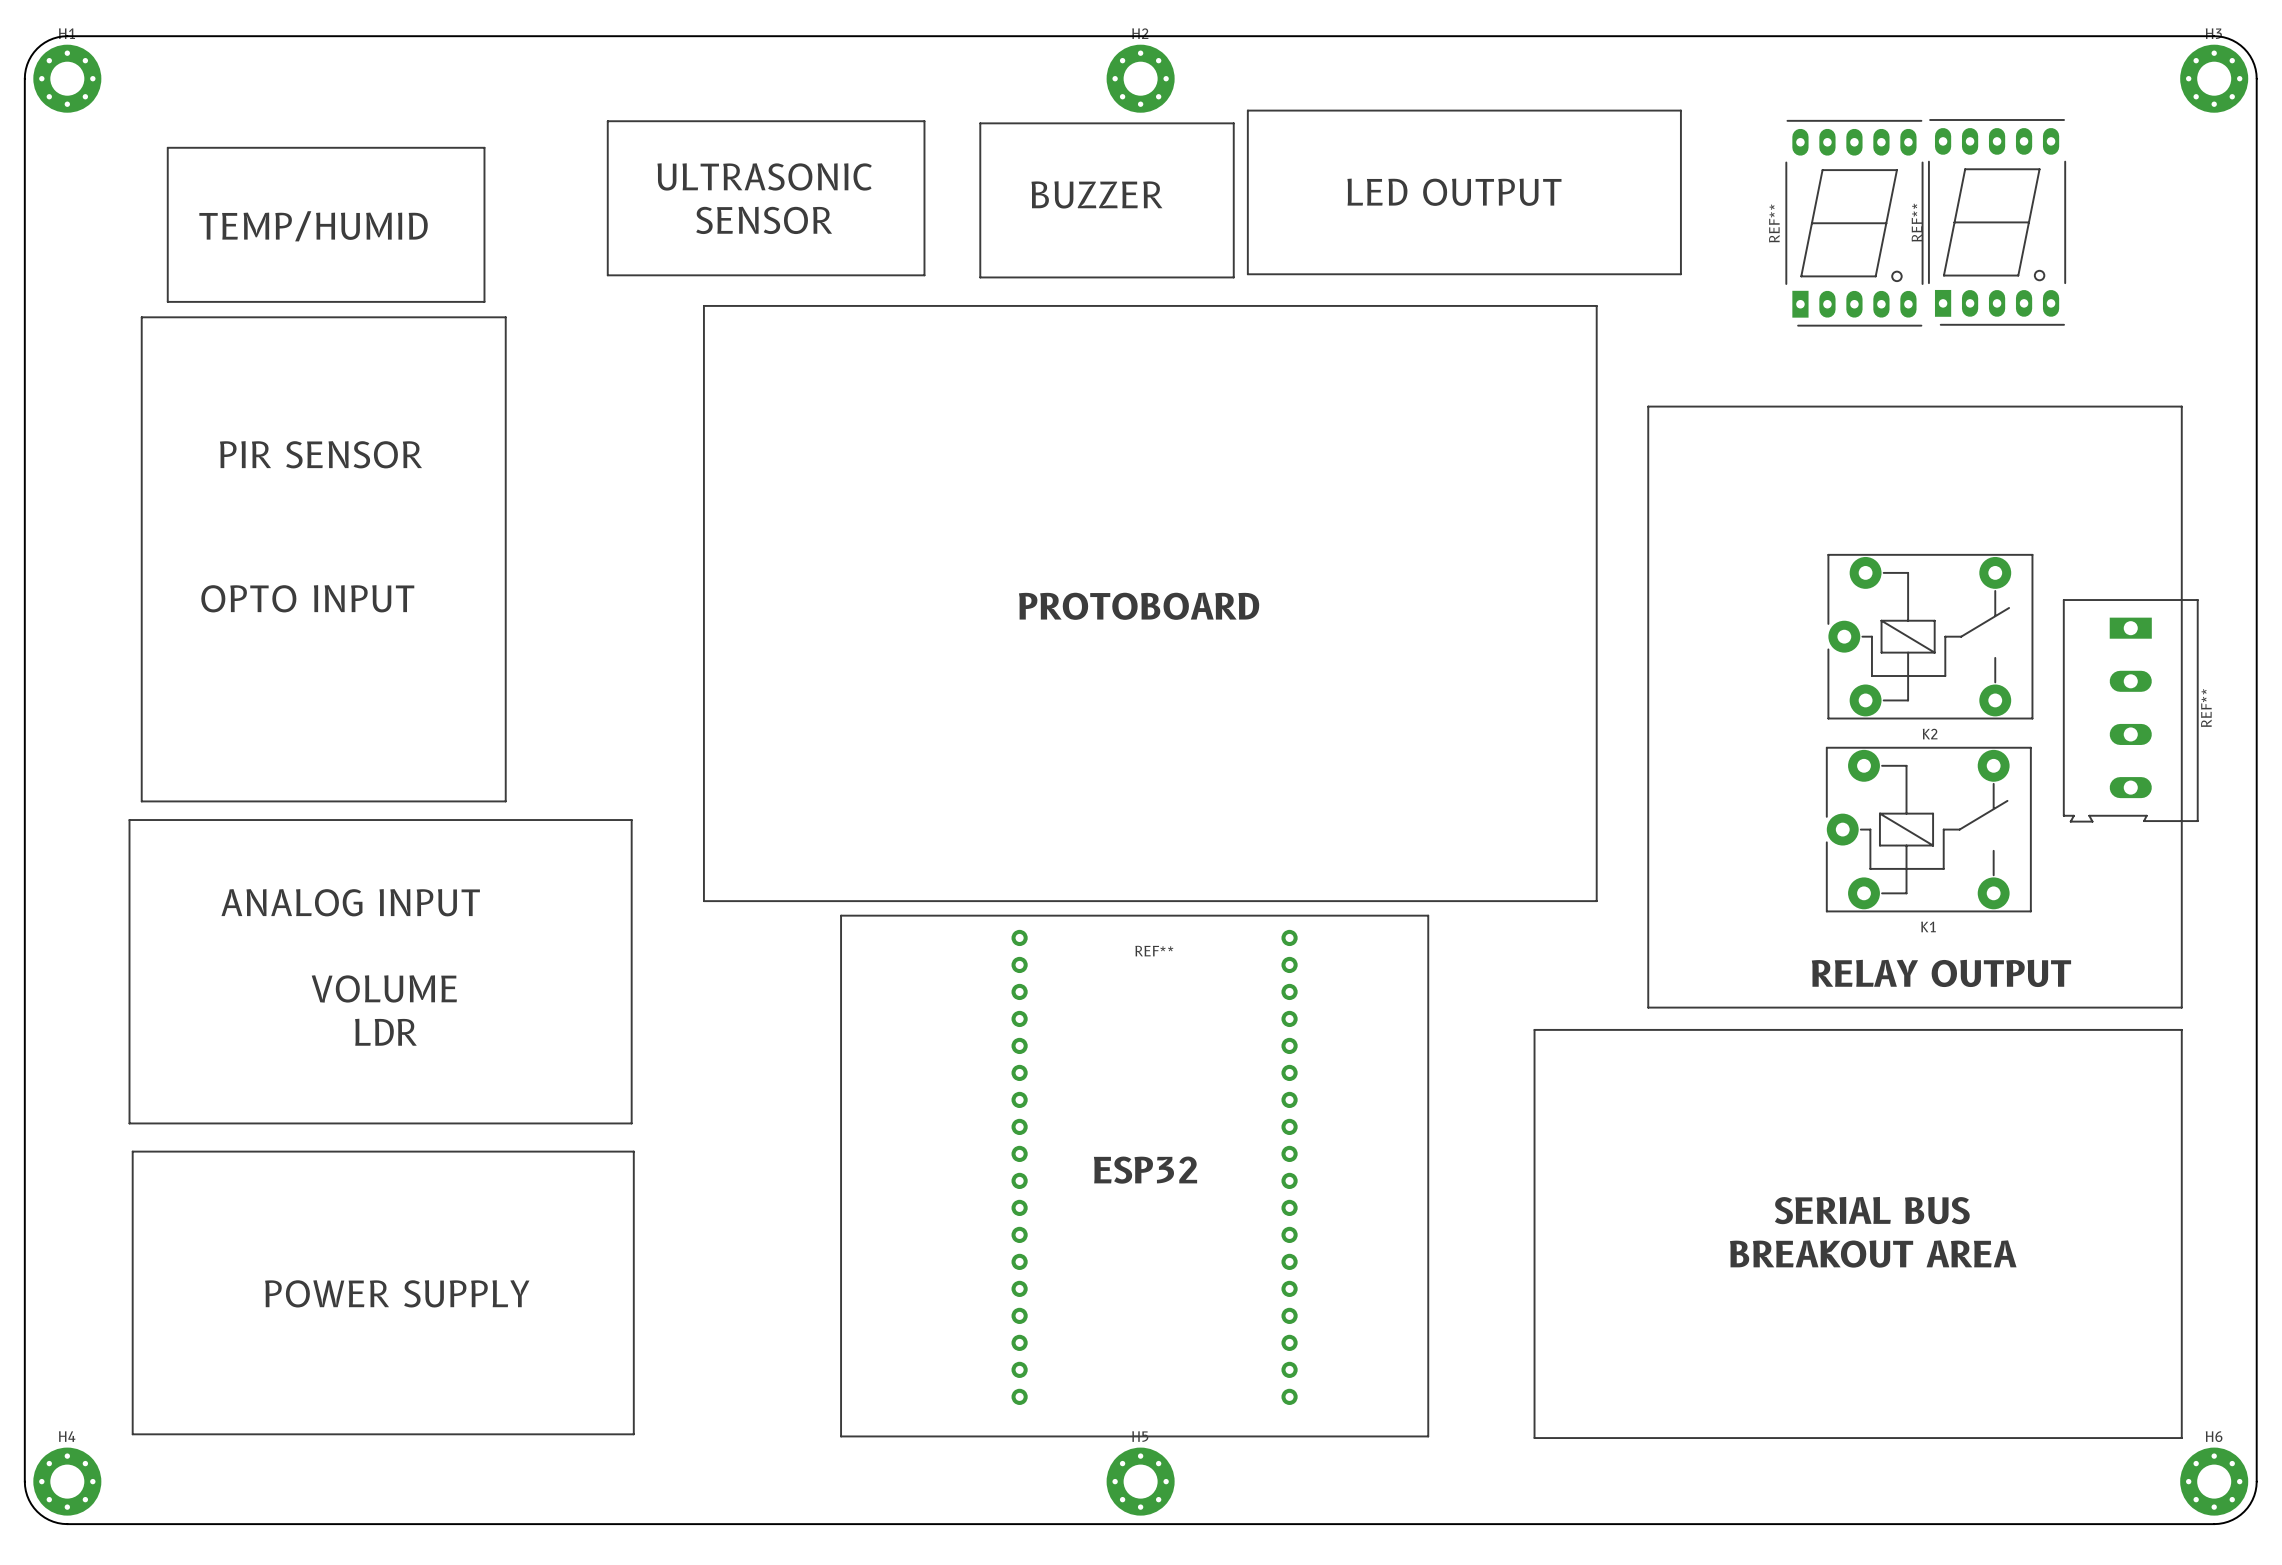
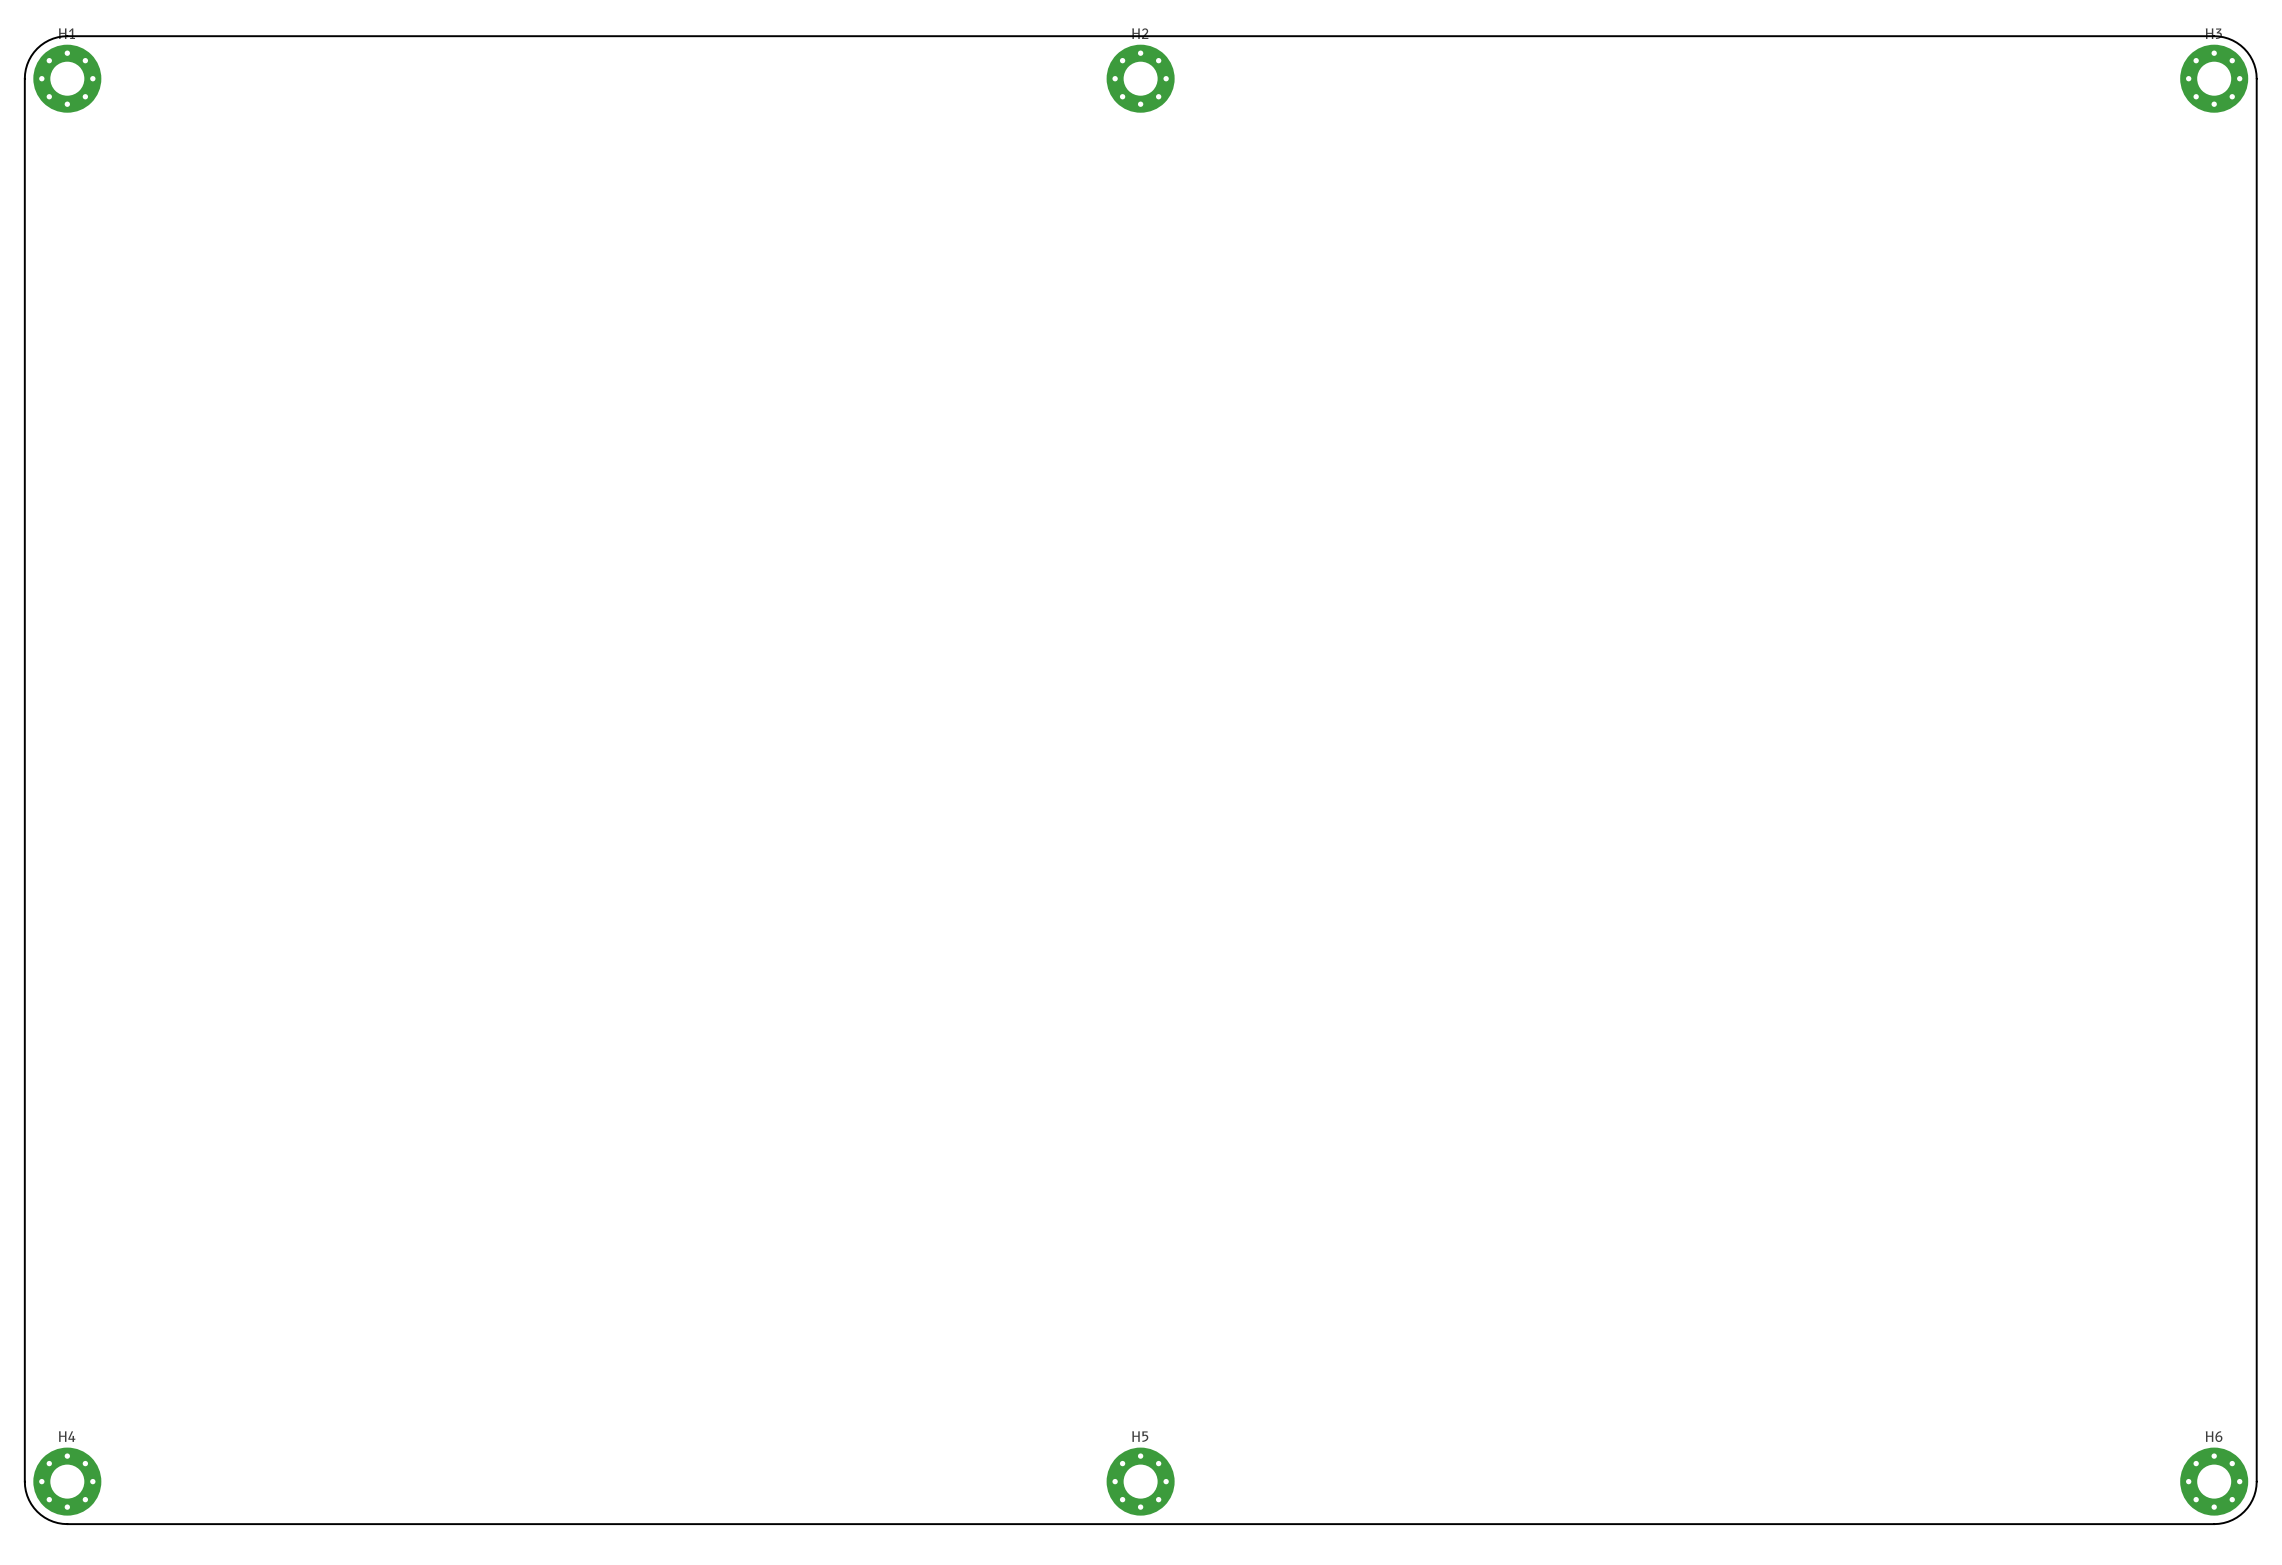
line: (1247, 110) (1680, 110) (1680, 274) (1247, 274) (1247, 110) -> none
line: (607, 121) (924, 121) (924, 275) (607, 275) (607, 121) -> none
line: (980, 123) (1233, 123) (1233, 277) (980, 277) (980, 123) -> none
line: (167, 147) (484, 147) (484, 301) (167, 301) (167, 147) -> none
text: ULTRASONIC (764, 176) -> none
text: LED OUTPUT (1454, 192) -> none
text: BUZZER (1096, 194) -> none
text: SENSOR (764, 220) -> none
REF**: (1997, 222) -> none
REF**: (1854, 223) -> none
text: TEMP/HUMID (313, 226) -> none
line: (703, 305) (1596, 305) (1596, 901) (703, 901) (703, 305) -> none
line: (141, 317) (505, 317) (505, 801) (141, 801) (141, 317) -> none
line: (1648, 406) (2181, 406) (2181, 1007) (1648, 1007) (1648, 406) -> none
text: PIR SENSOR (320, 454) -> none
text: OPTO INPUT (307, 598) -> none
text: PROTOBOARD (1139, 606) -> none
K2: (1930, 636) -> none
REF**: (2130, 710) -> none
line: (129, 820) (631, 820) (631, 1123) (129, 1123) (129, 820) -> none
K1: (1928, 829) -> none
text: ANALOG INPUT (350, 902) -> none
line: (841, 915) (1428, 915) (1428, 1436) (841, 1436) (841, 915) -> none
text: RELAY OUTPUT (1941, 973) -> none
text: VOLUME (384, 988) -> none
line: (1534, 1029) (2181, 1029) (2181, 1438) (1534, 1438) (1534, 1029) -> none
text: LDR (385, 1032) -> none
line: (132, 1151) (633, 1151) (633, 1434) (132, 1434) (132, 1151) -> none
REF**: (1154, 1167) -> none
text: ESP32 (1145, 1170) -> none
text: SERIAL BUS (1872, 1210) -> none
text: BREAKOUT AREA (1873, 1254) -> none
text: POWER SUPPLY (397, 1293) -> none

